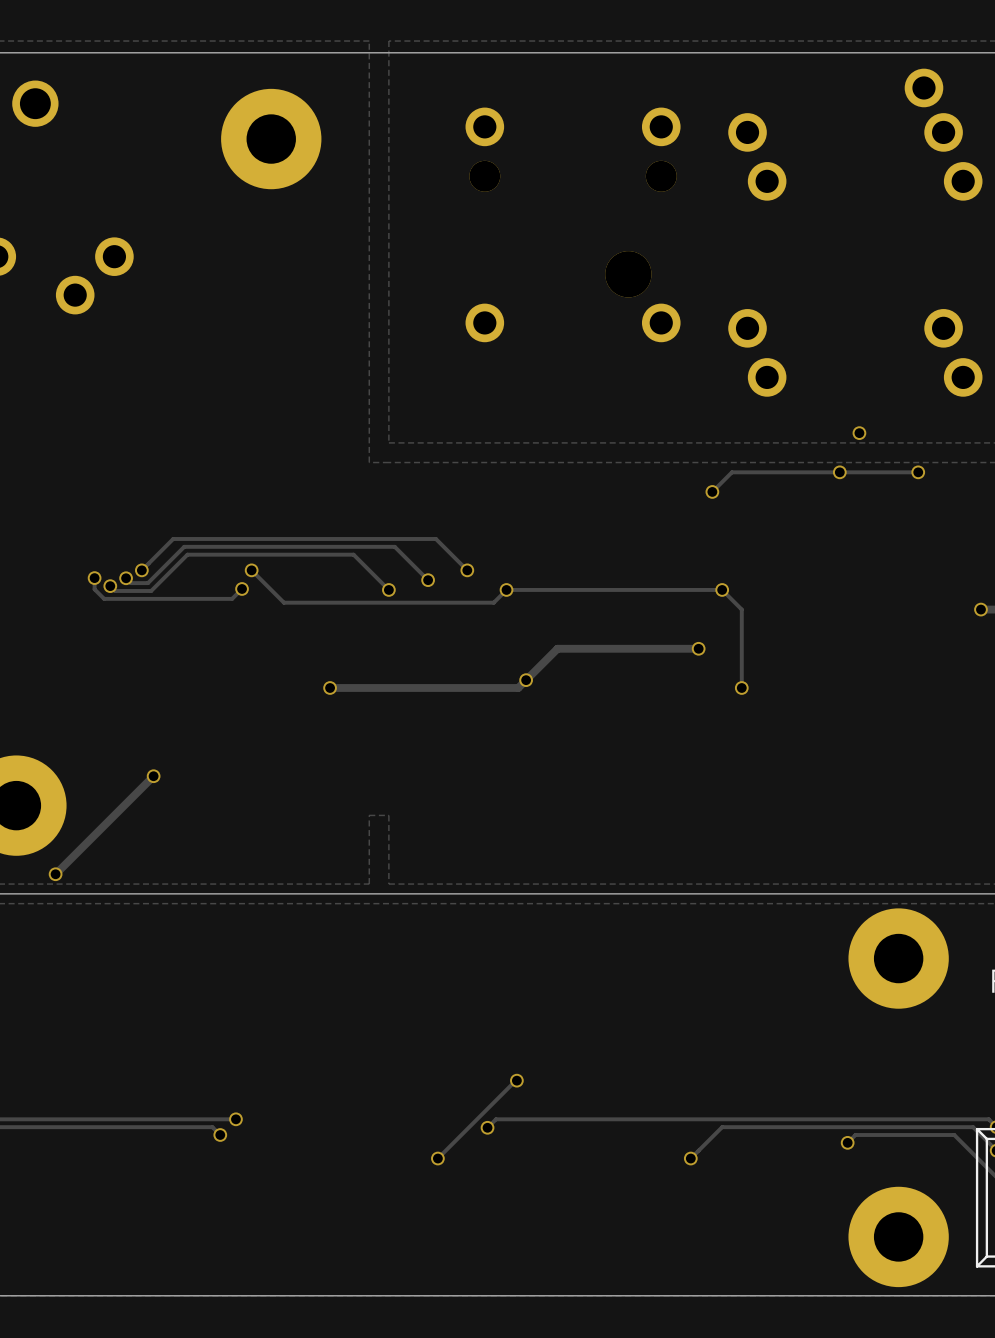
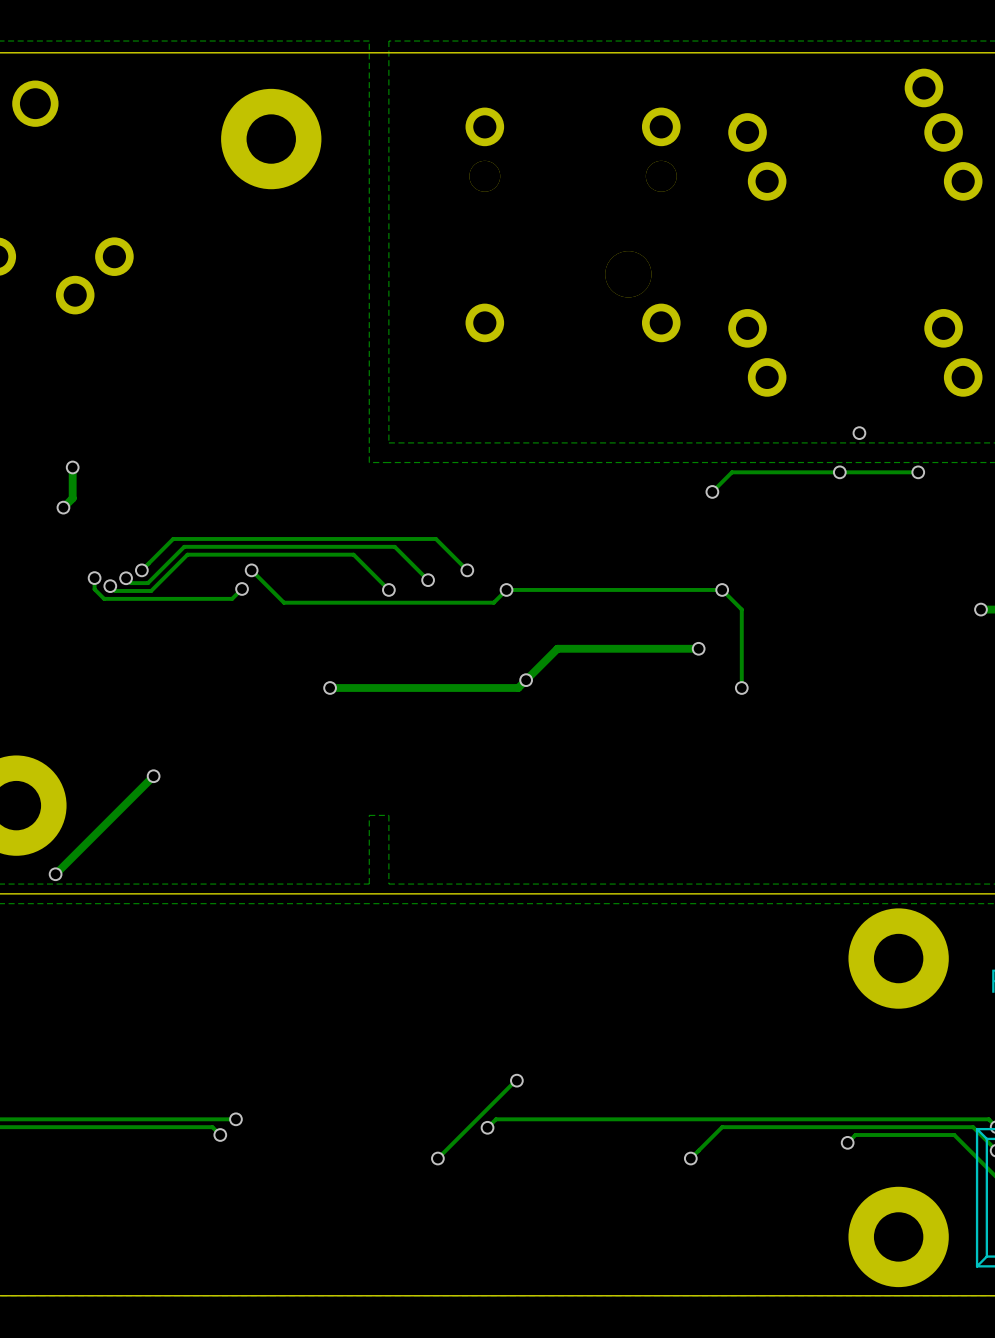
track: none -> (72, 467) (72, 498) (63, 507)
via: none -> (72, 467)
via: none -> (63, 507)

